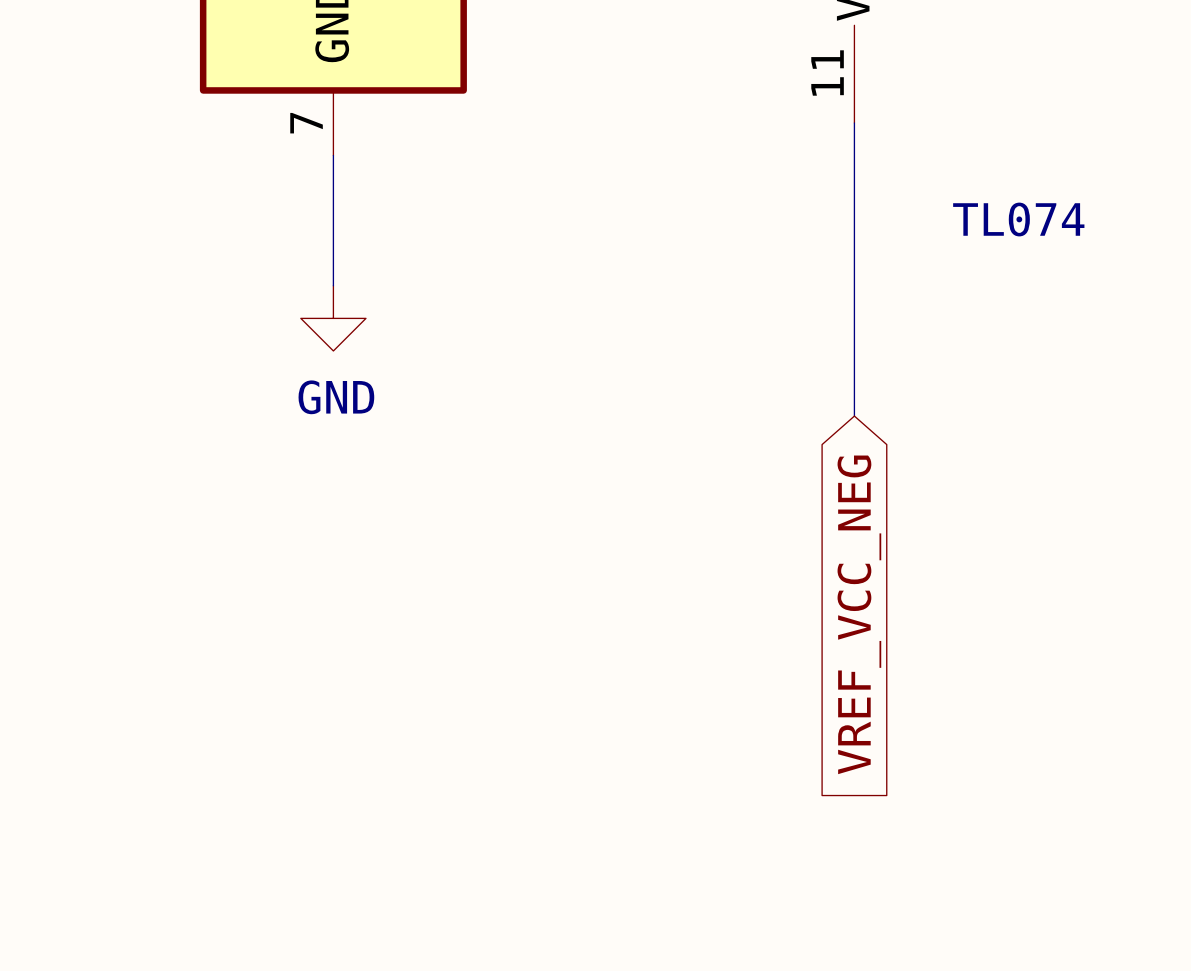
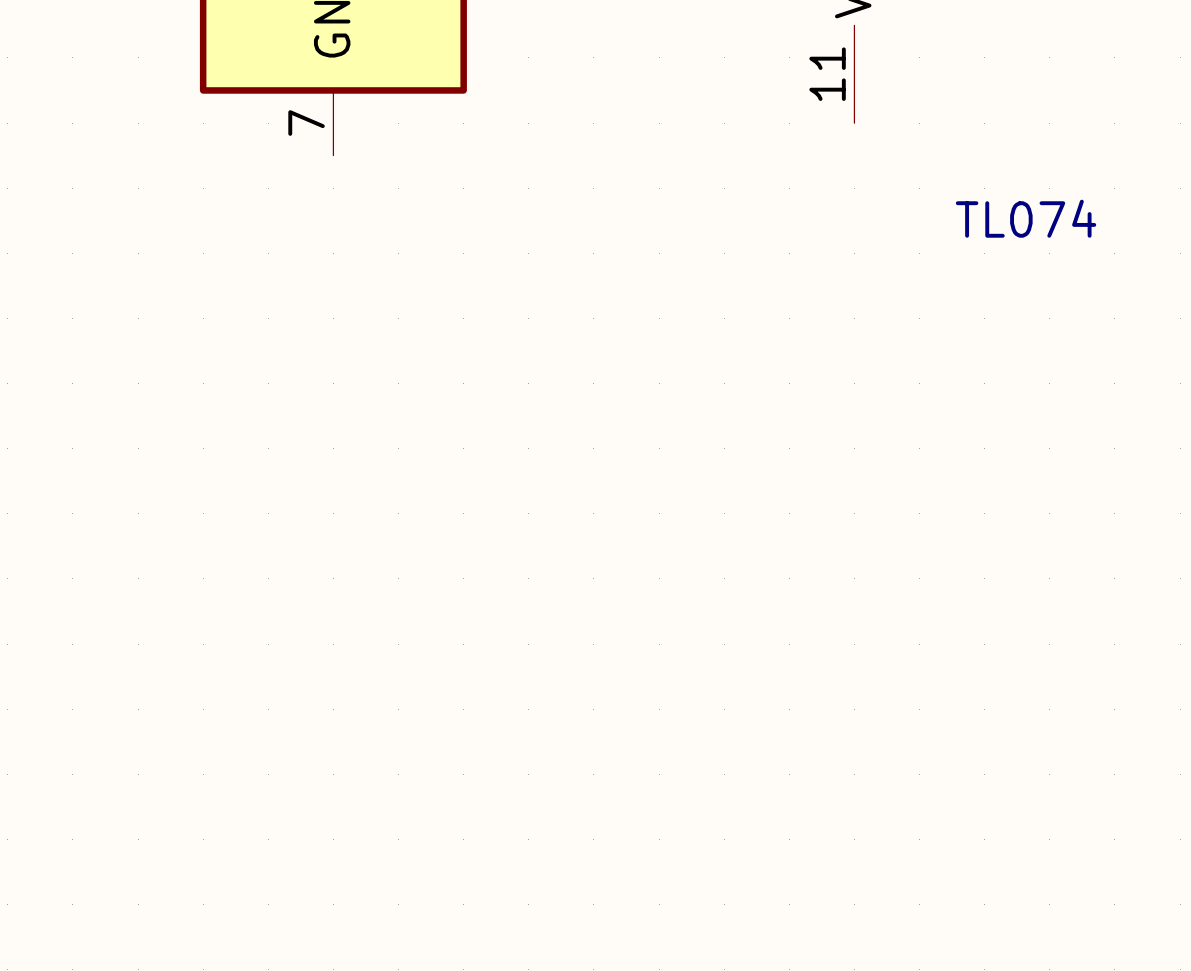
wire: (854, 123) (854, 416) -> none
wire: (333, 155) (333, 285) -> none
power symbol: GND (333, 318) -> none
global label: VREF_VCC_NEG (859, 614) -> none

